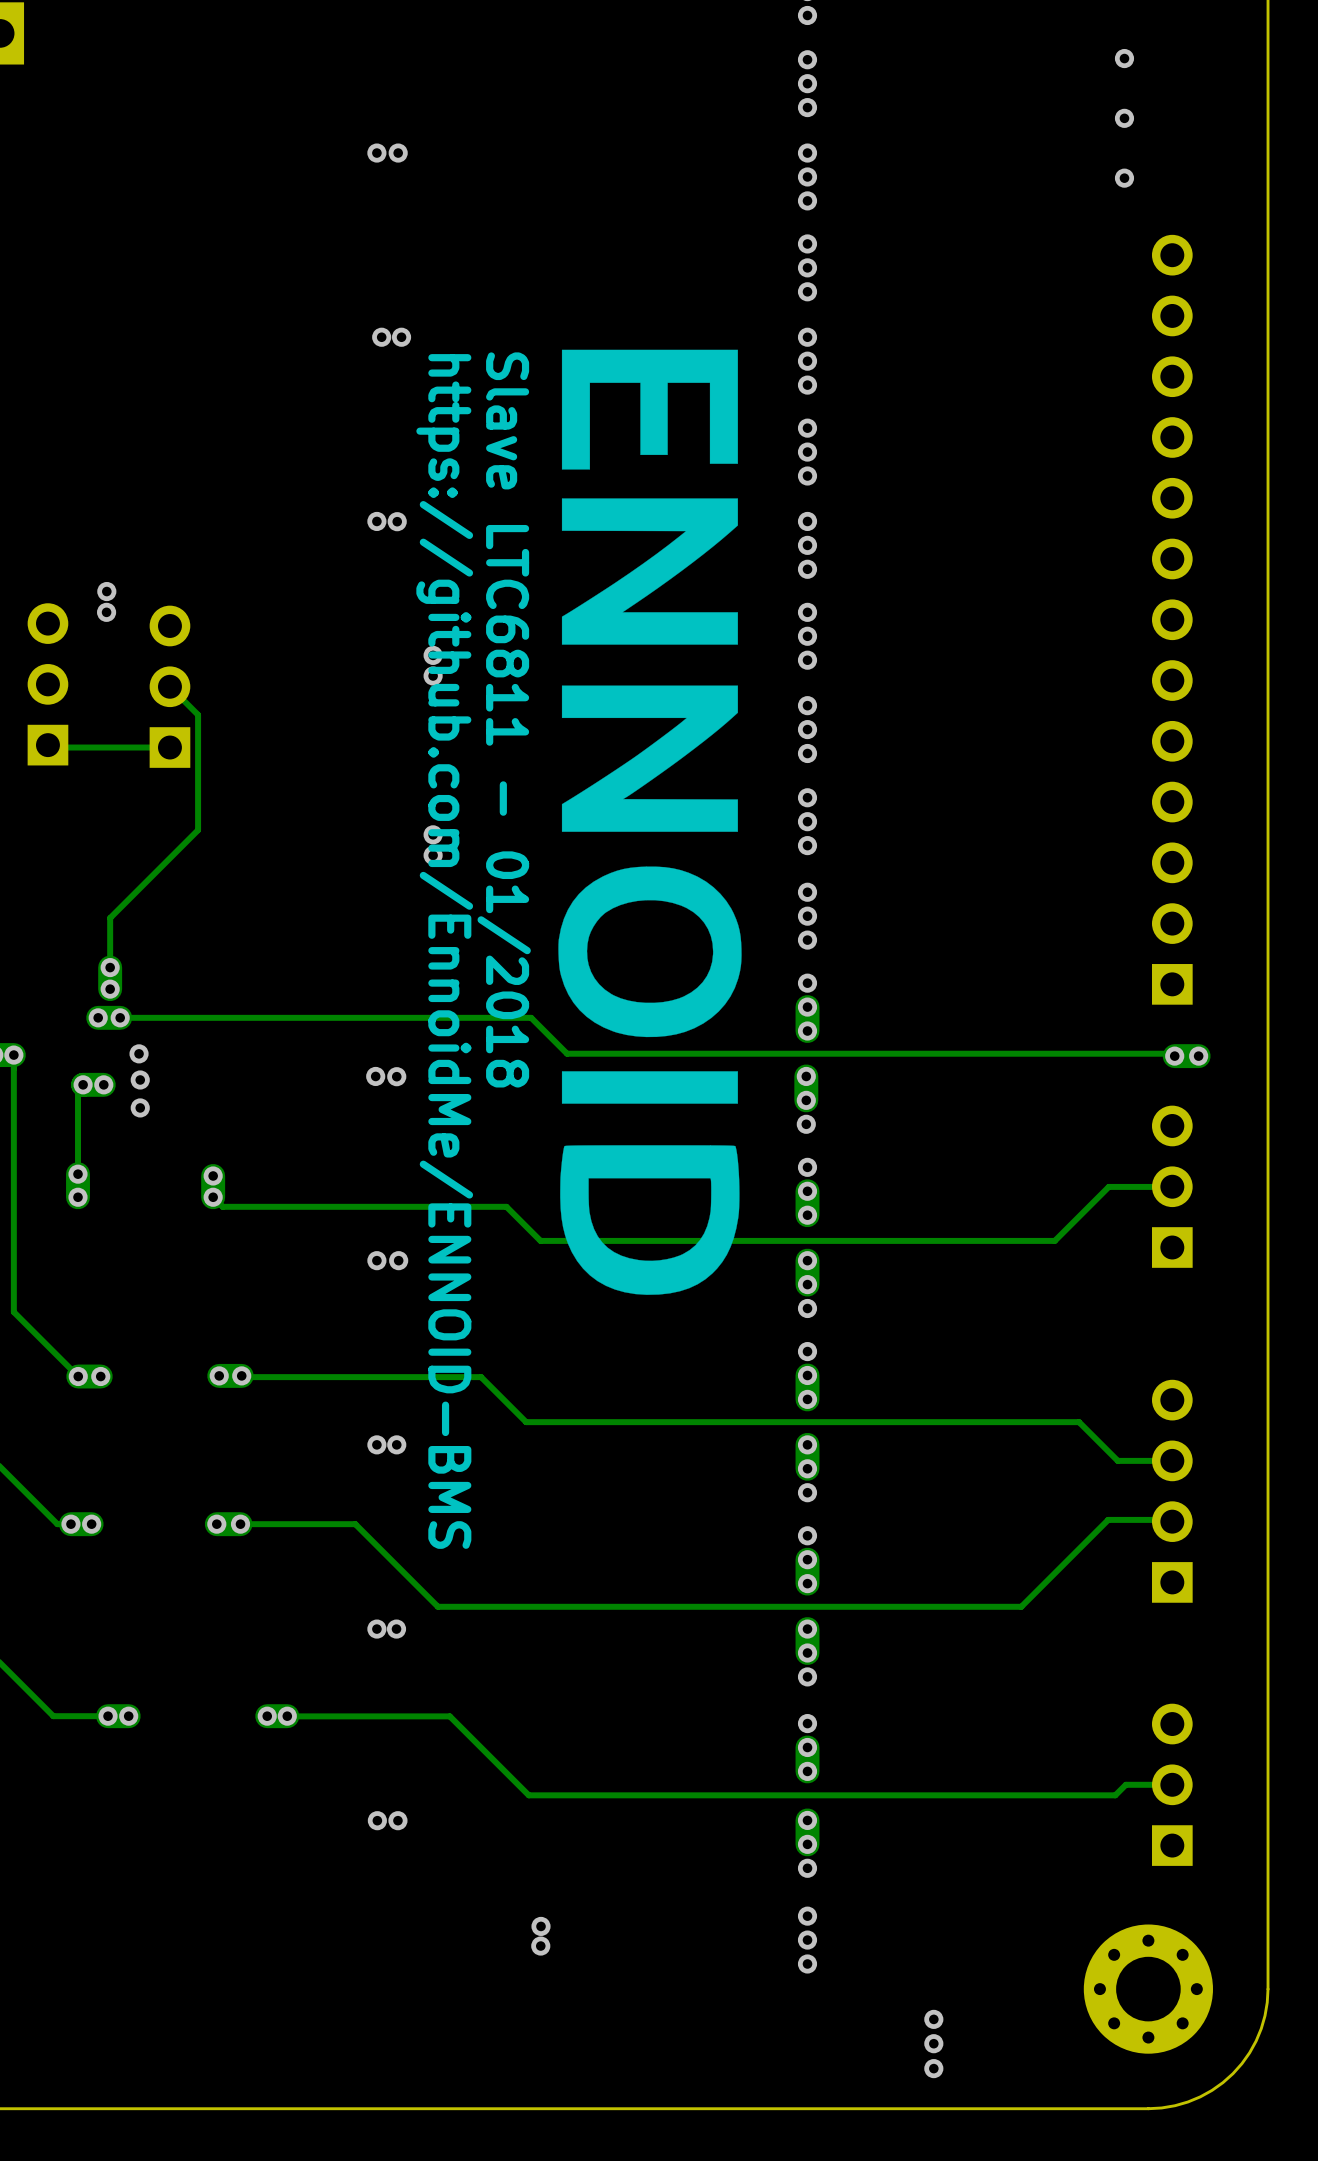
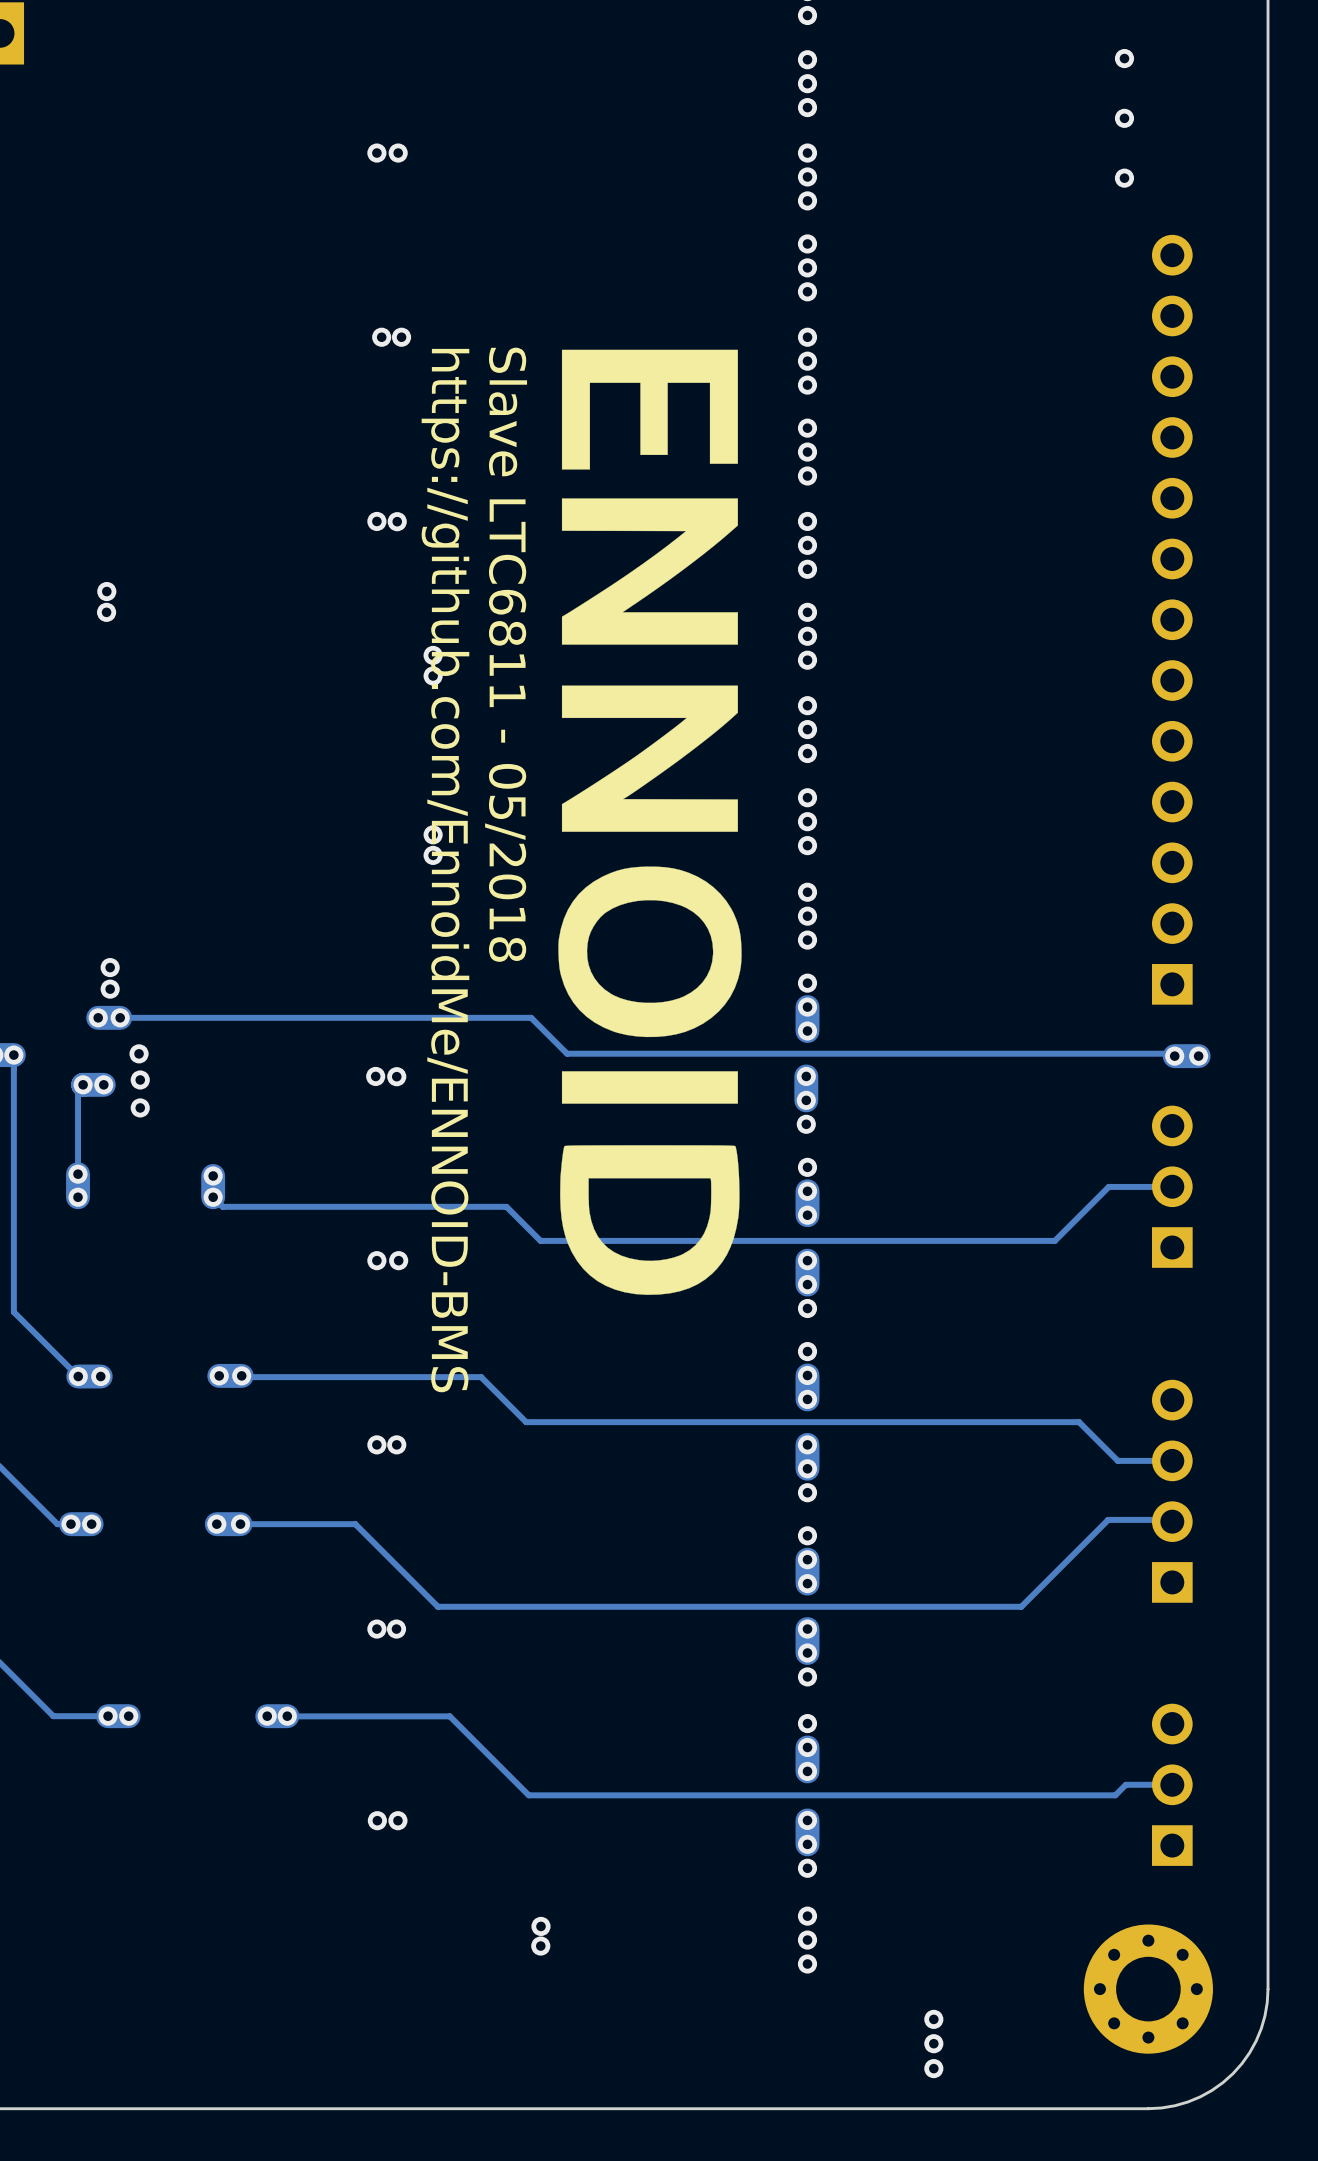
part: (47, 684) -> none
track: (169, 686) (198, 714) (198, 830) (110, 918) (110, 989) -> none
part: (169, 686) -> none
text: Slave LTC6811 - 01/2018 (504, 719) -> Slave LTC6811 - 05/2018 (506, 654)
track: (47, 745) (50, 747) (169, 747) -> none

